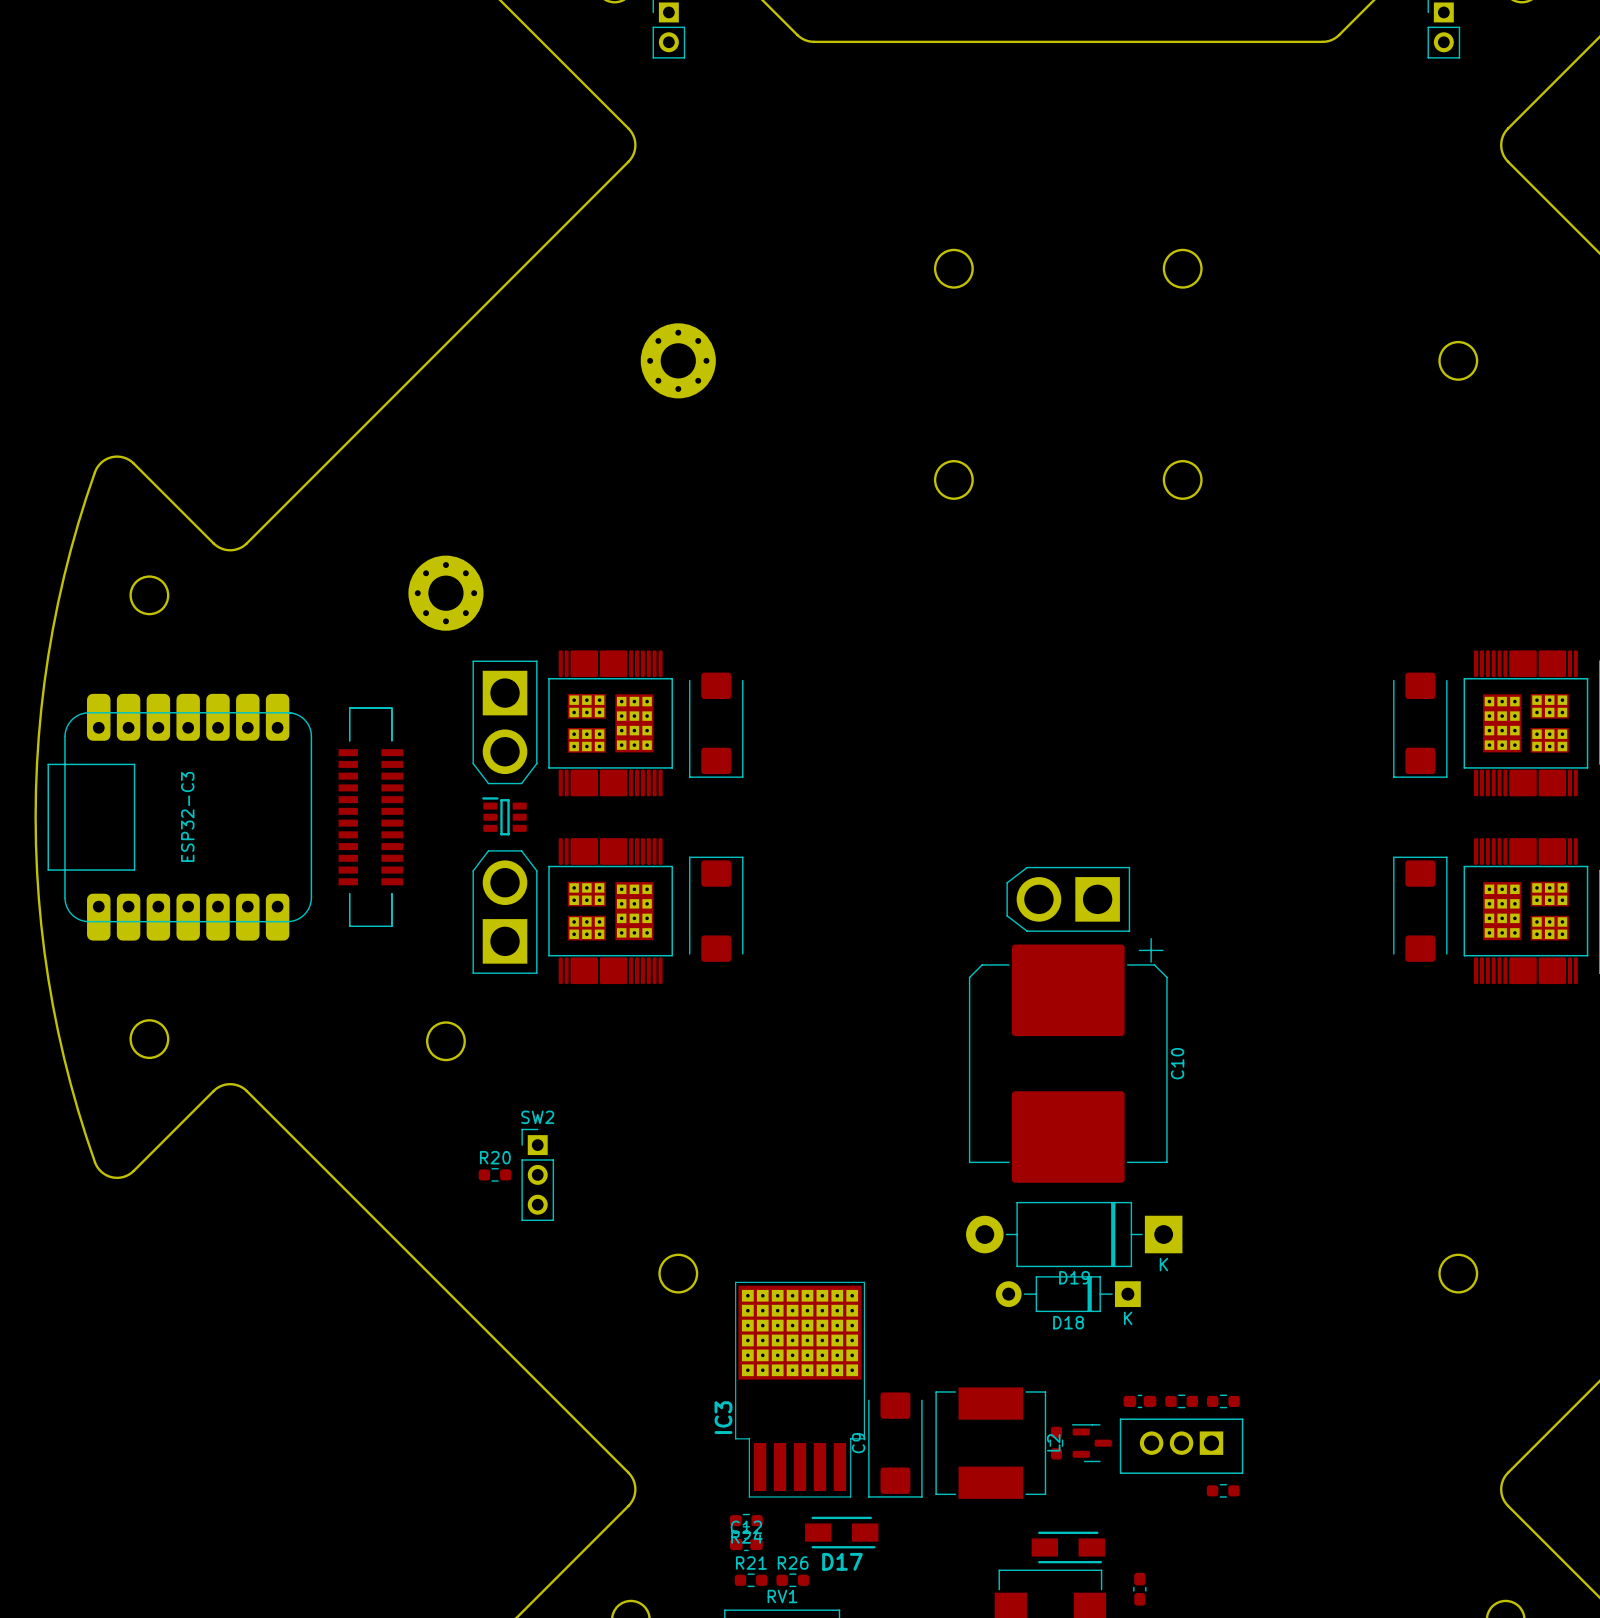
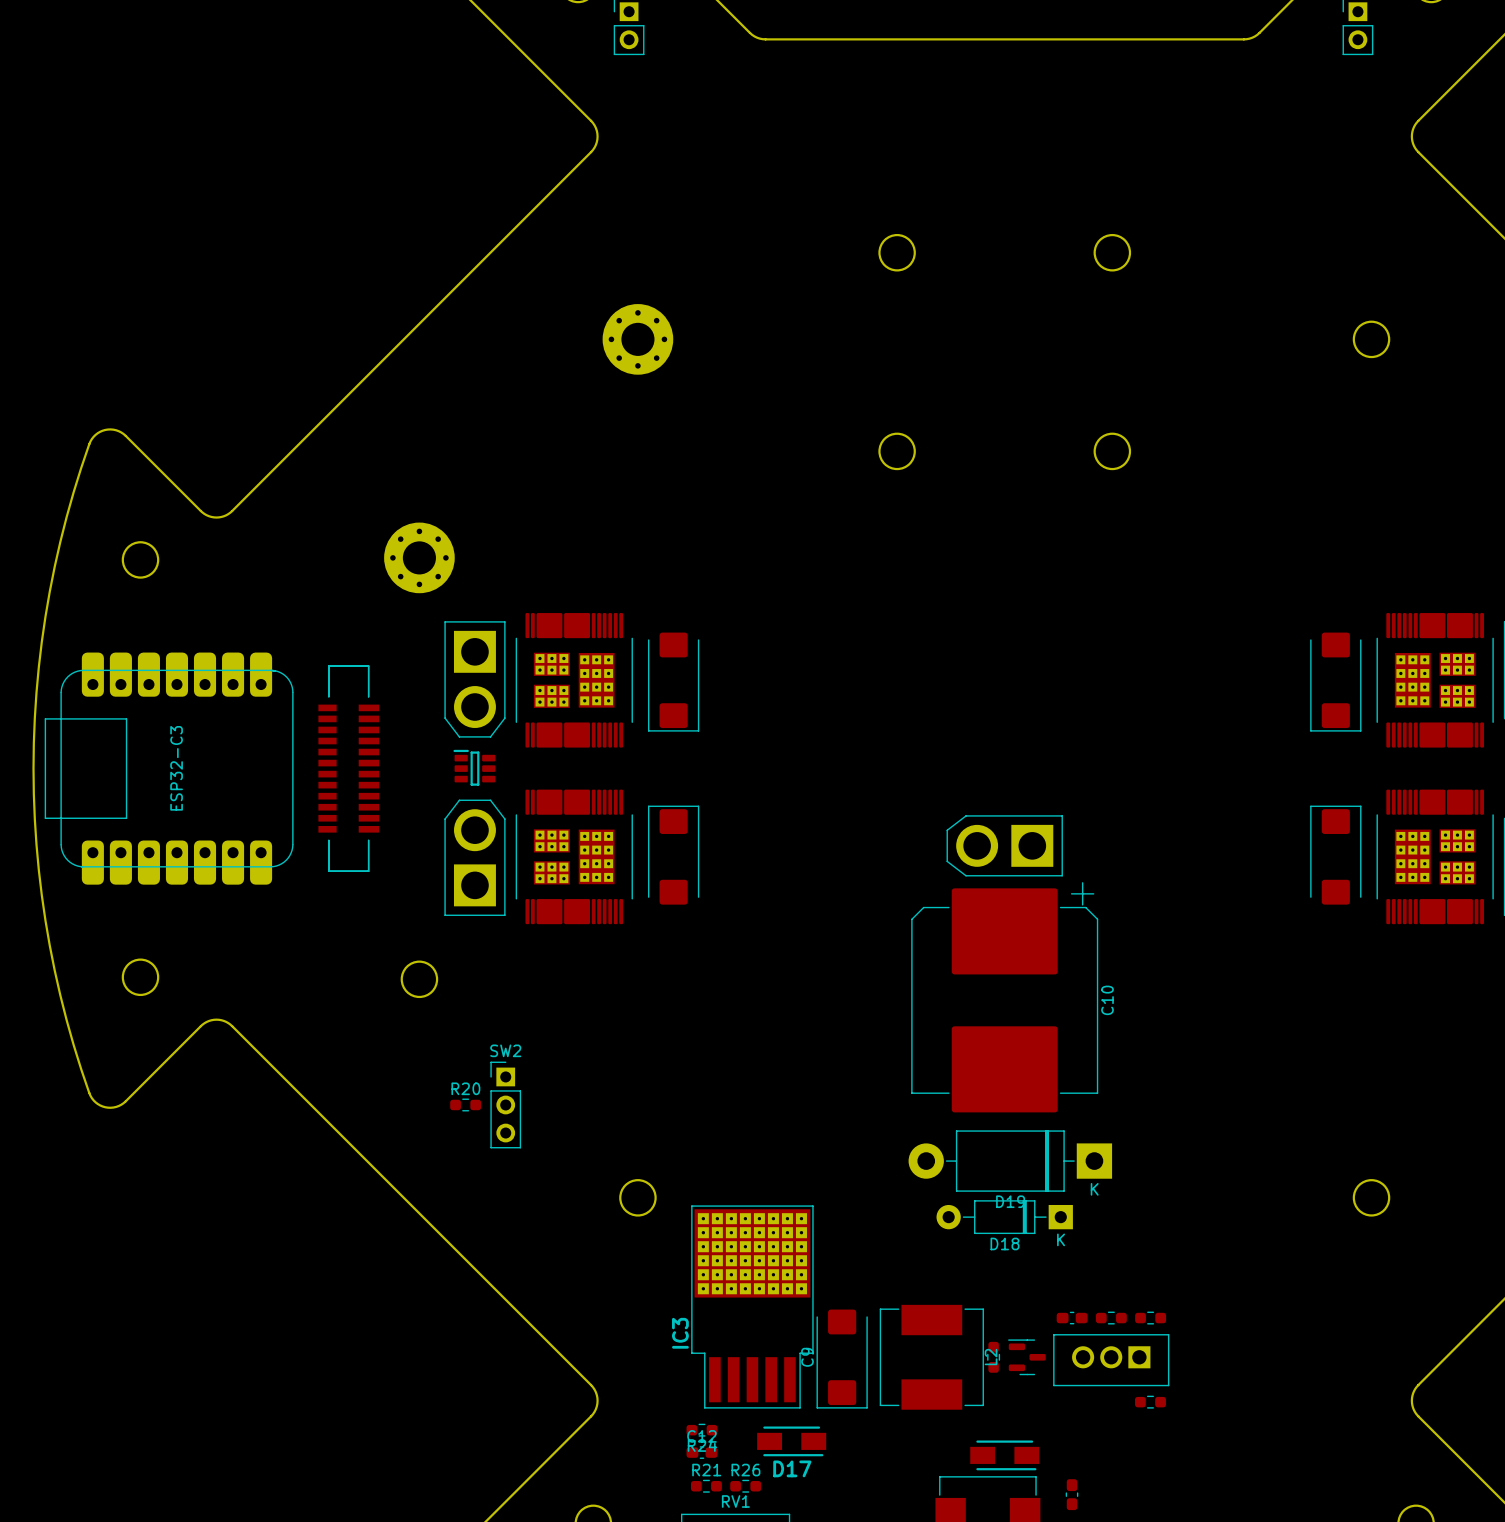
part footprint: [548, 650, 673, 797] -> [515, 613, 633, 748]
part footprint: [1463, 650, 1589, 797] -> [1376, 613, 1494, 748]
part footprint: [548, 838, 673, 985] -> [515, 789, 633, 925]
part footprint: [1463, 838, 1589, 985] -> [1376, 789, 1494, 925]

